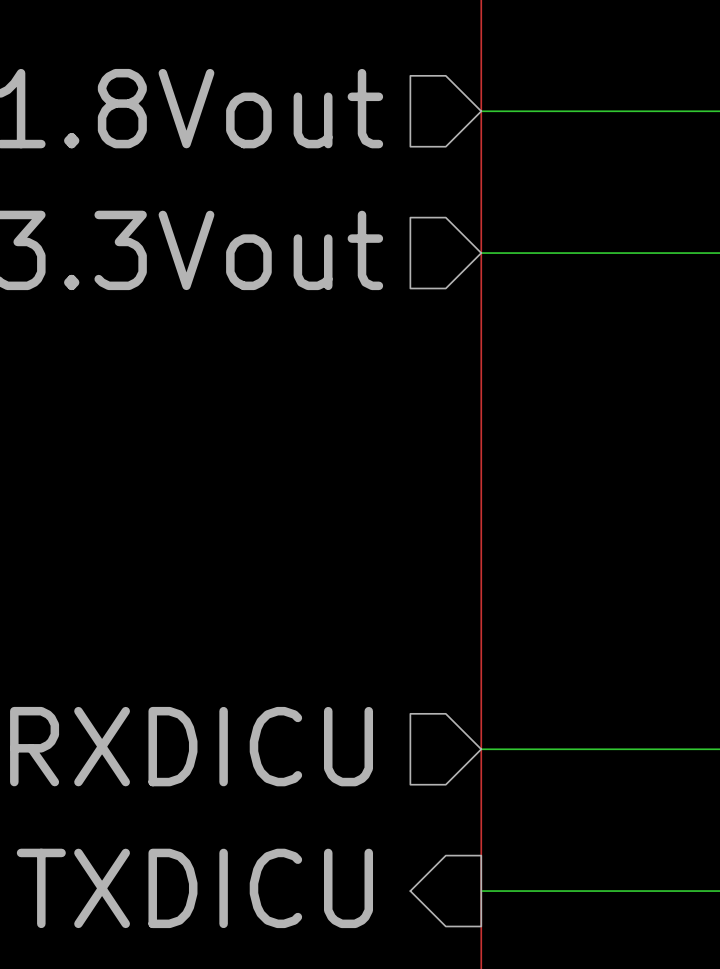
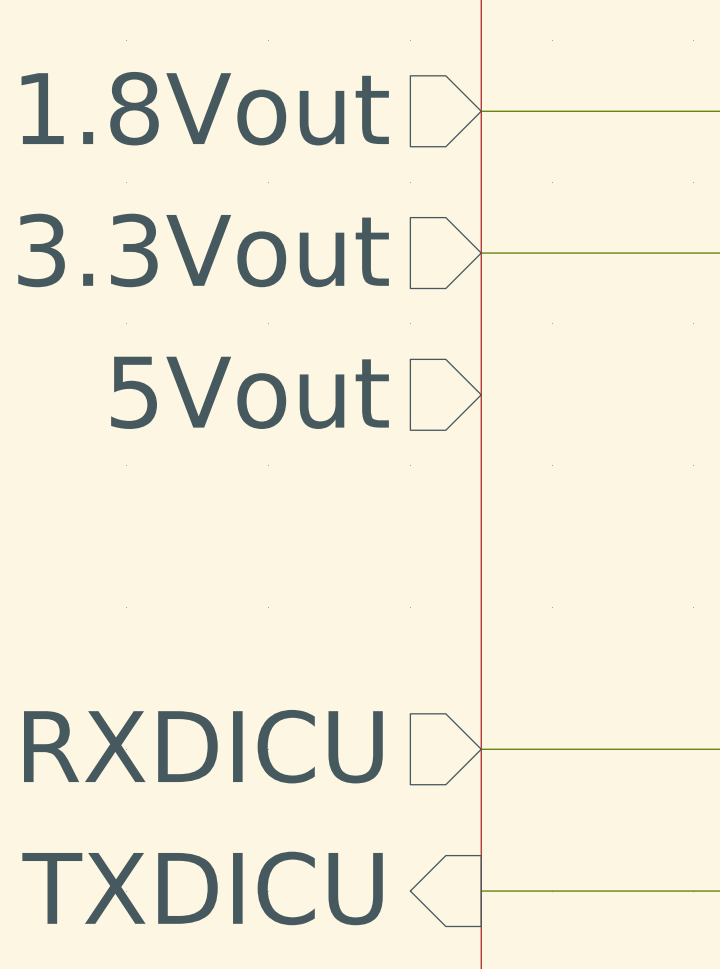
sheet pin: none -> 5Vout (250, 392)

